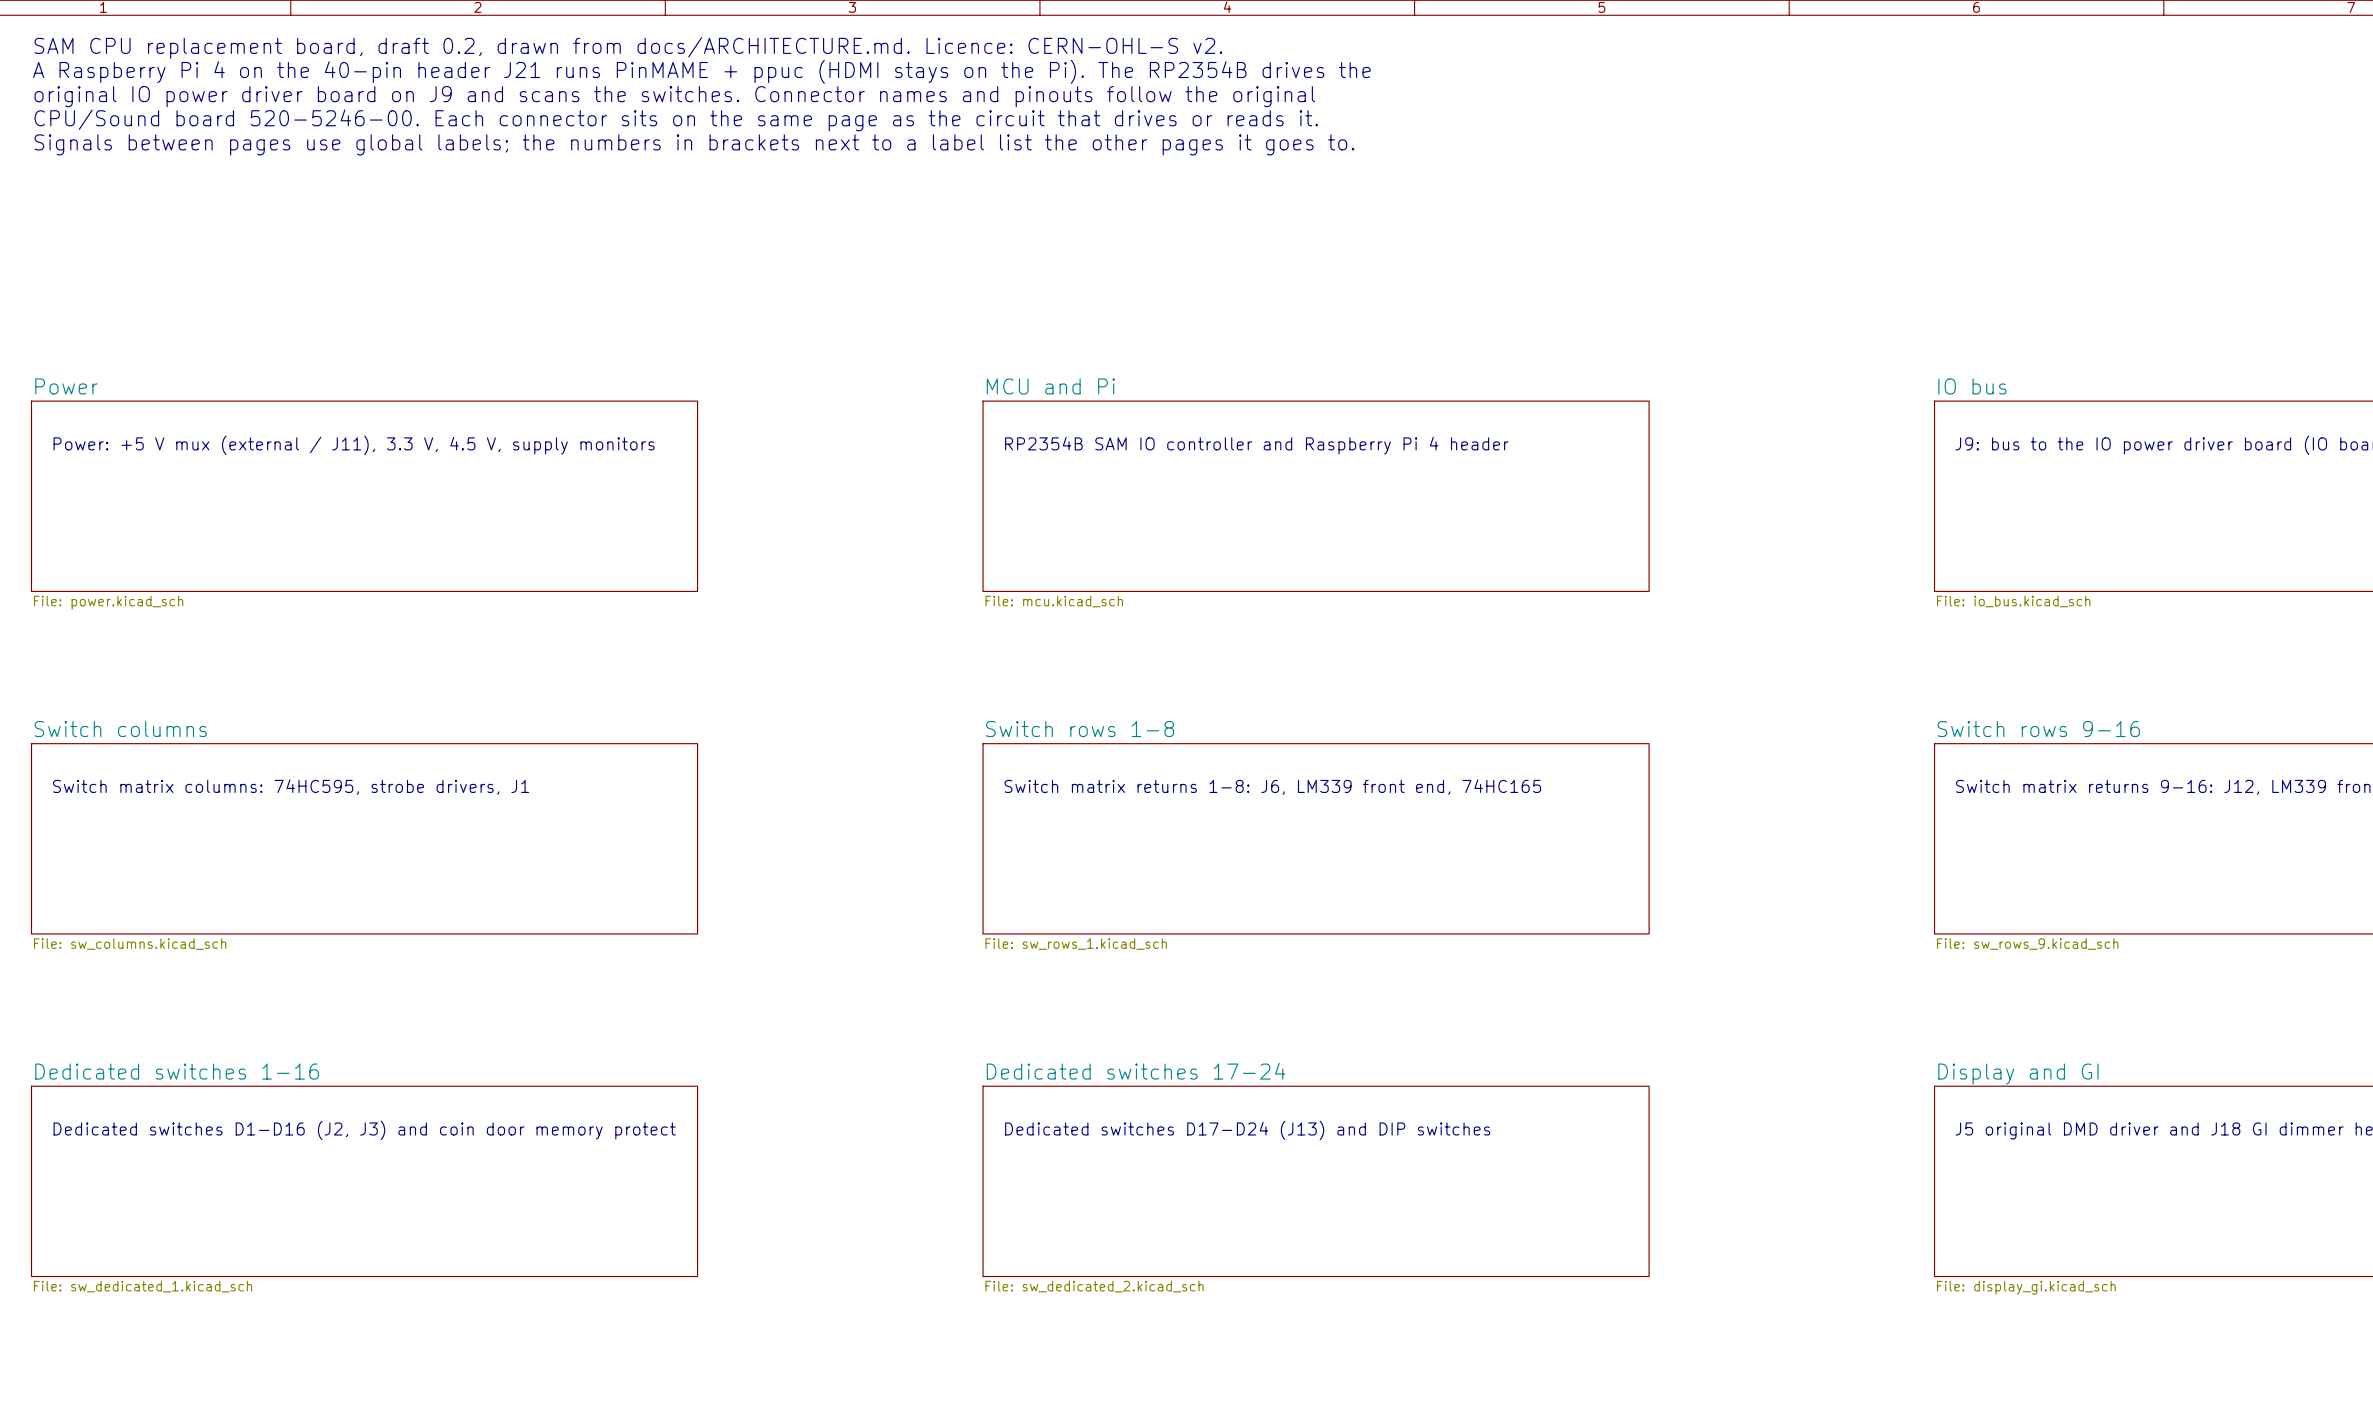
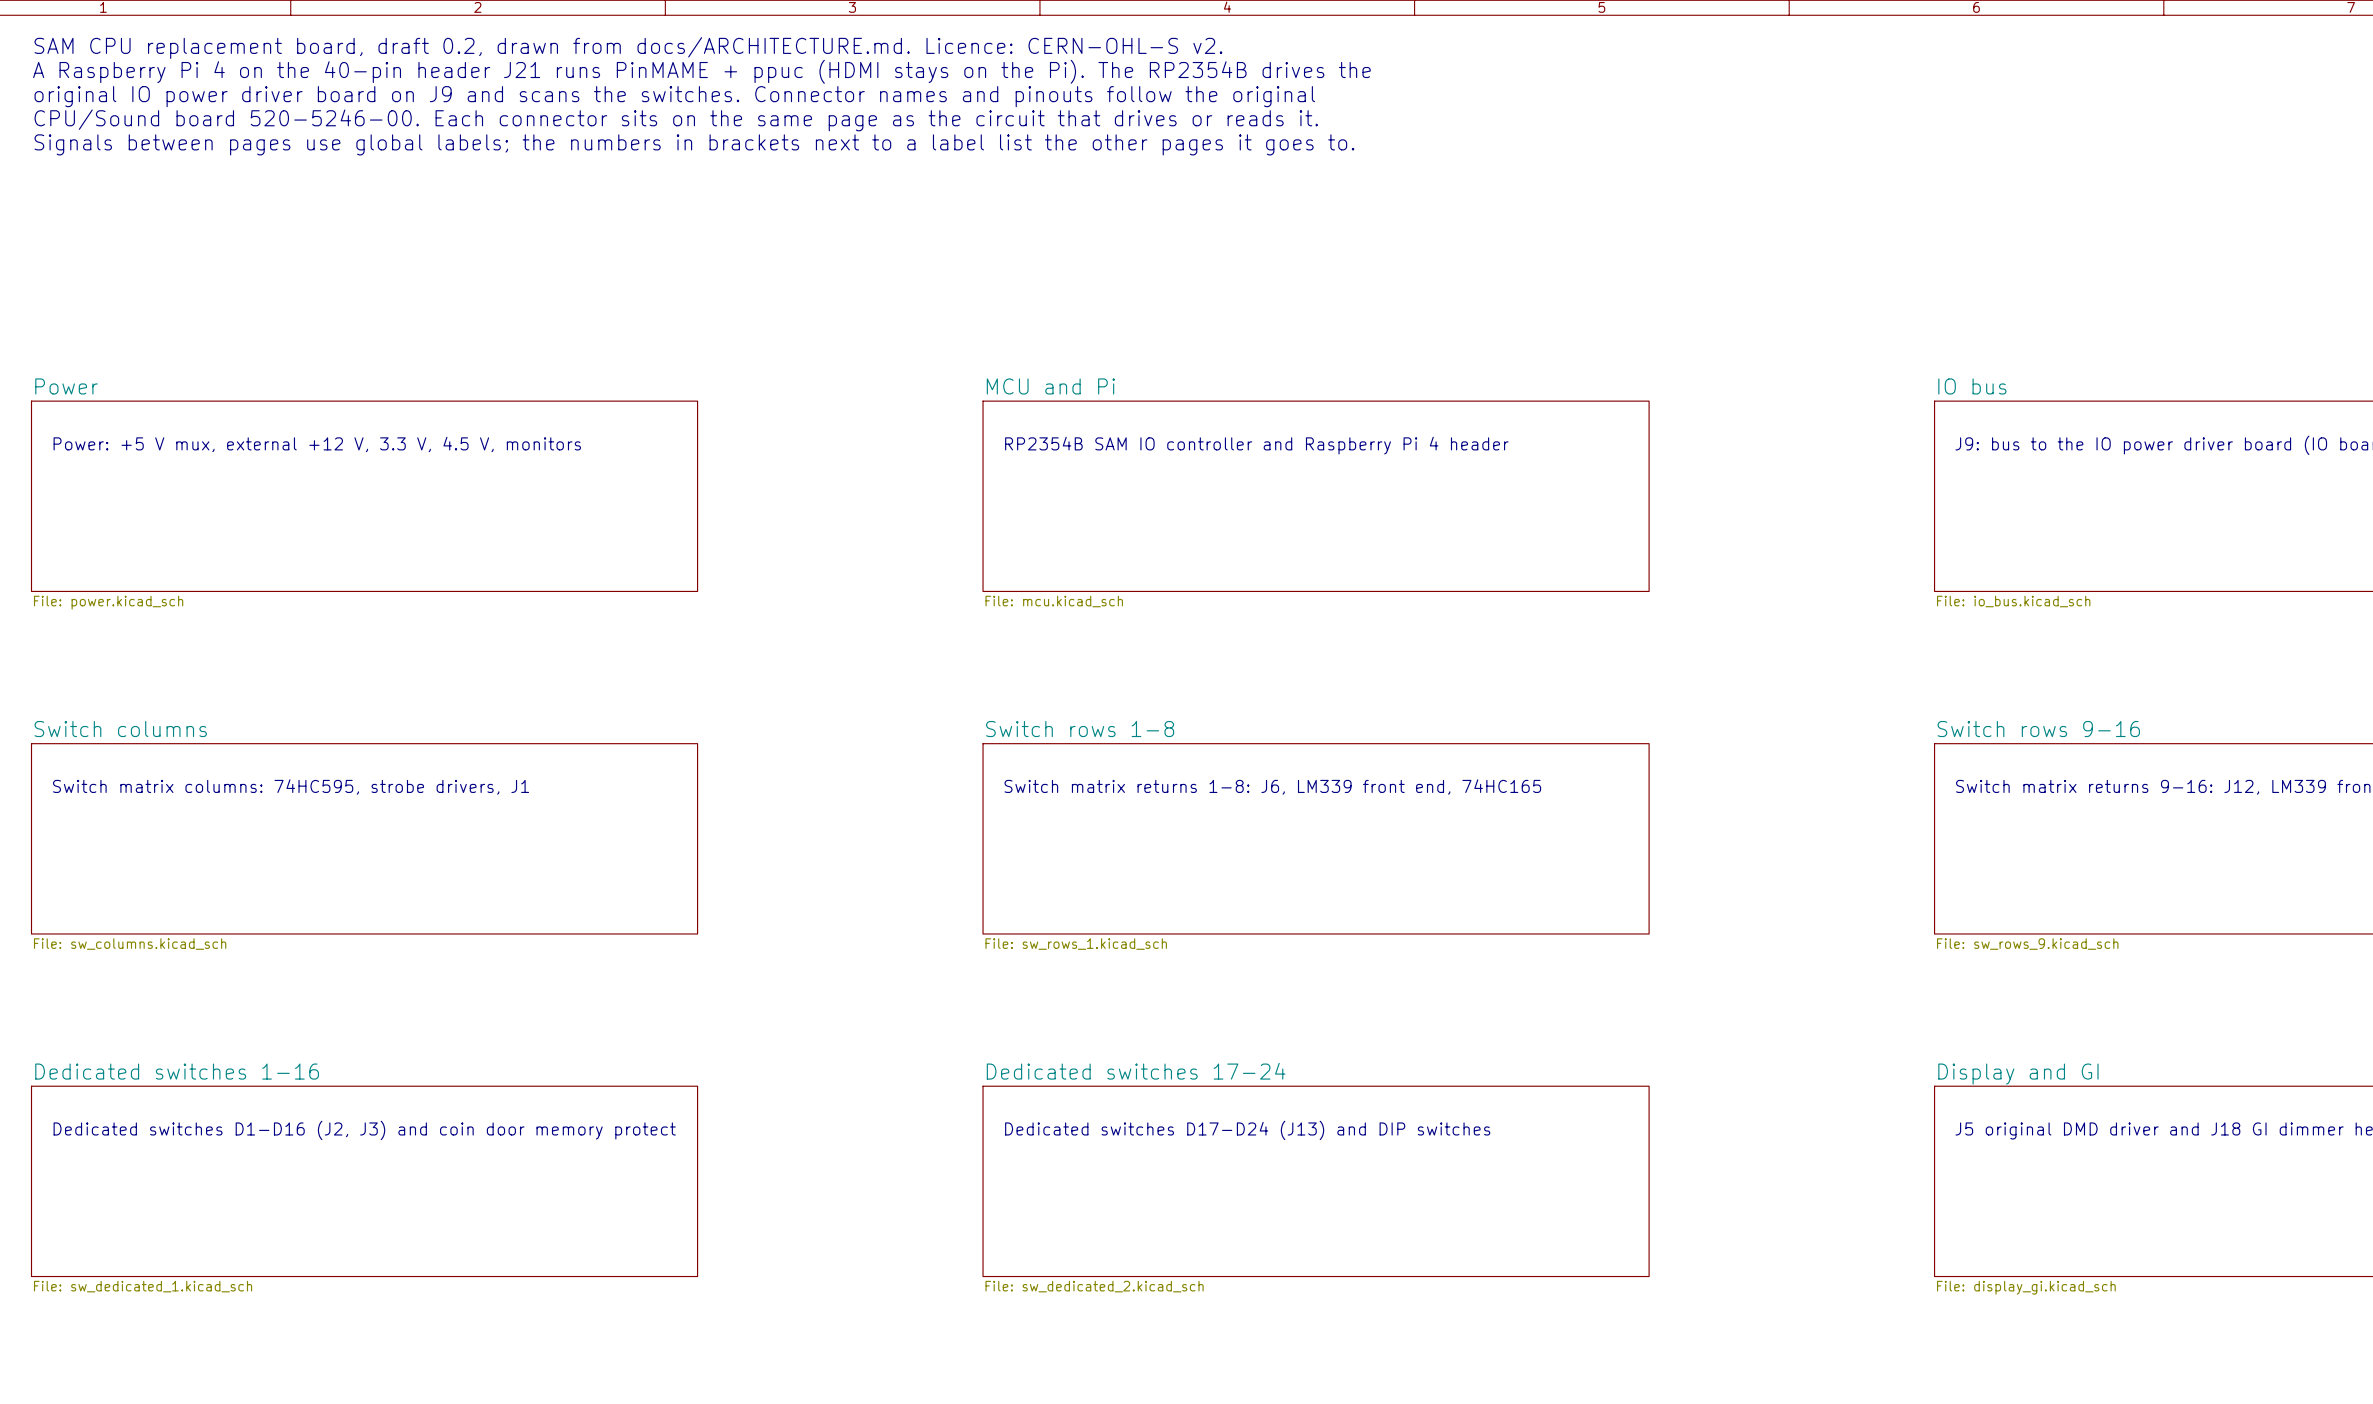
text: Power: +5 V mux (external / J11), 3.3 V, 4.5 V, supply monitors (354, 445) -> Power: +5 V mux, external +12 V, 3.3 V, 4.5 V, monitors (317, 444)

